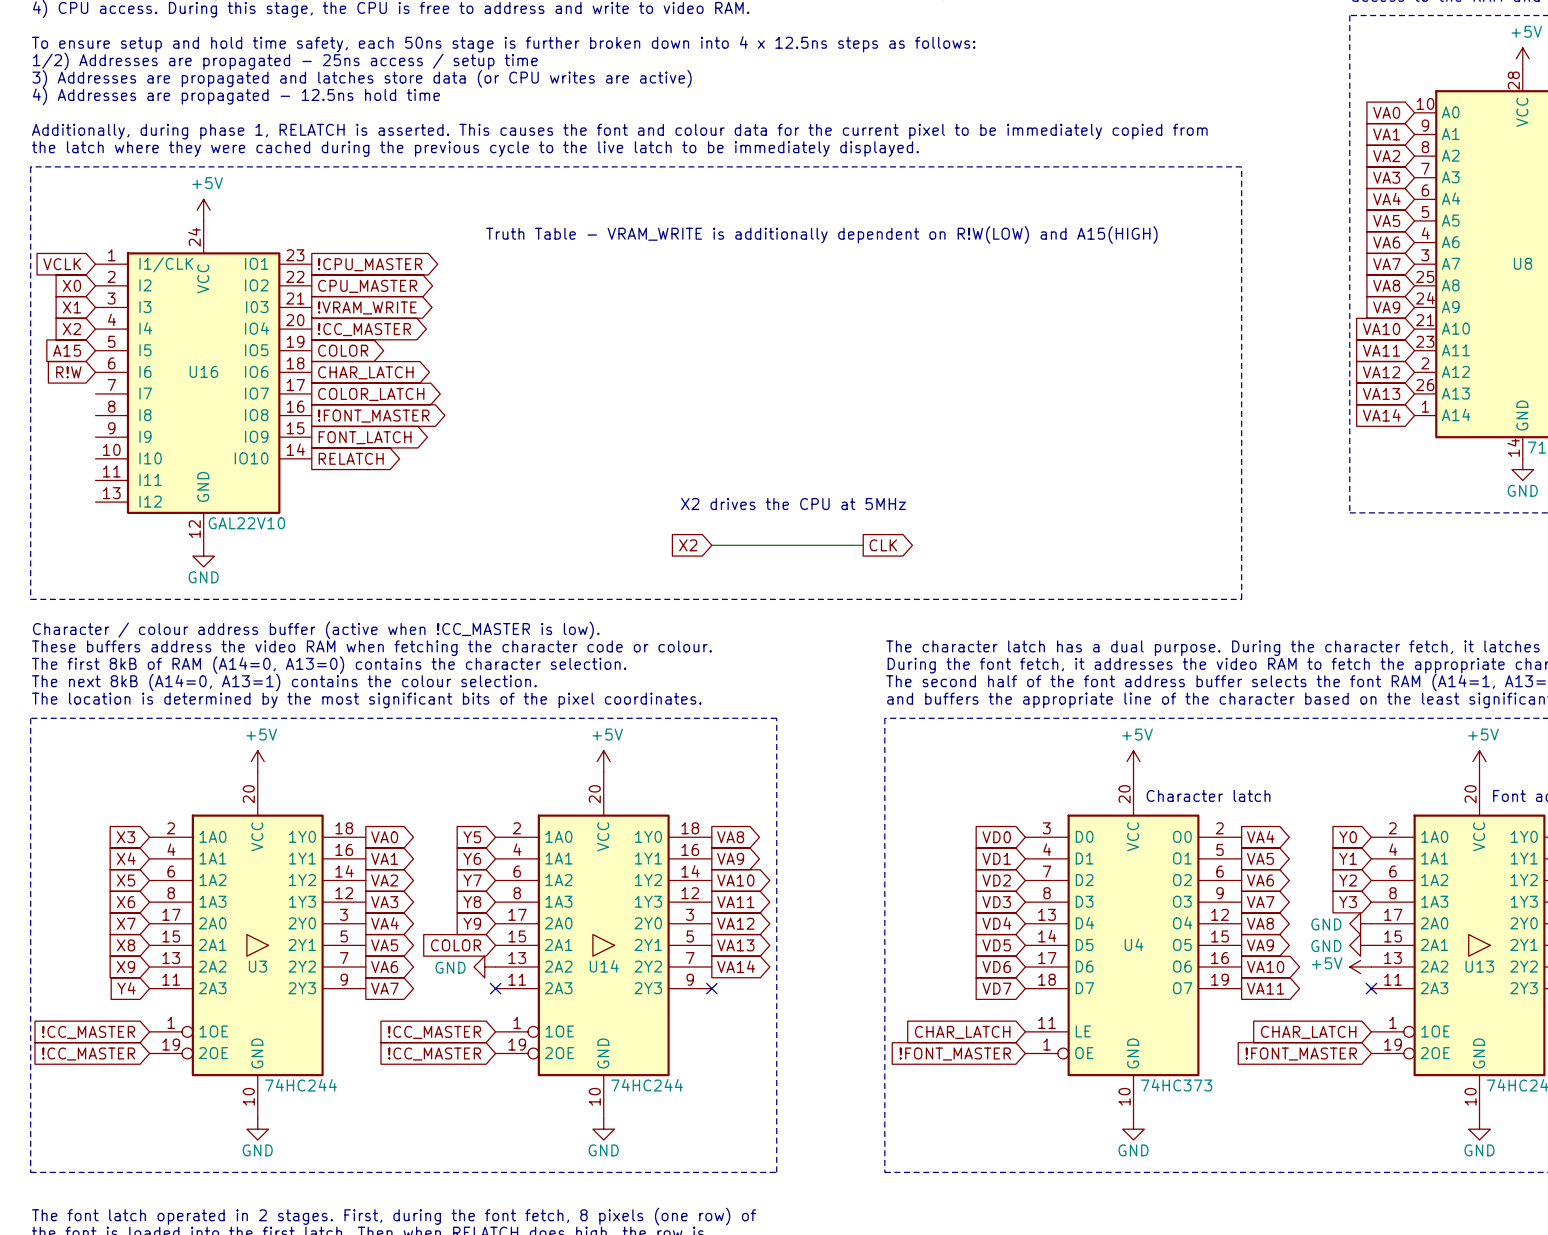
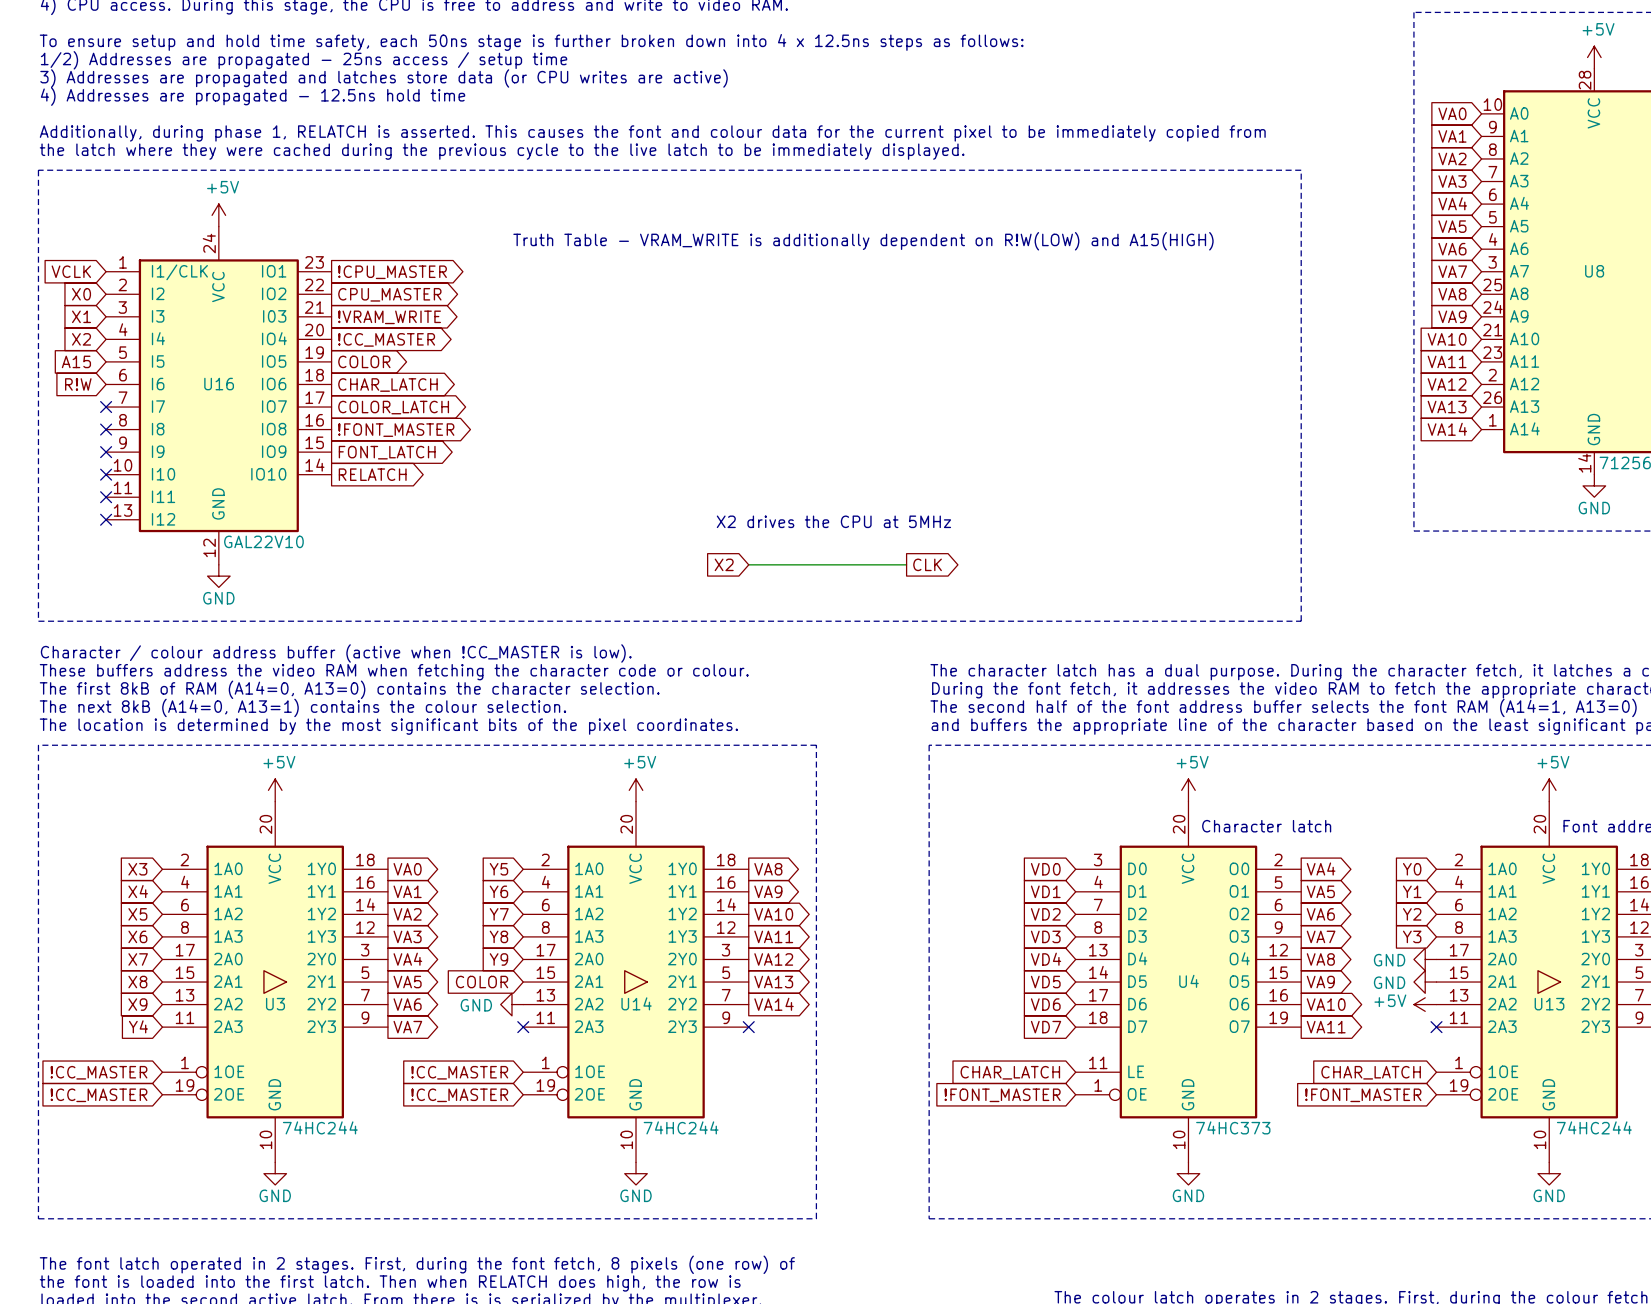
no-connect mark: none -> (106, 407)
no-connect mark: none -> (106, 429)
no-connect mark: none -> (106, 452)
no-connect mark: none -> (106, 474)
no-connect mark: none -> (106, 497)
no-connect mark: none -> (106, 519)

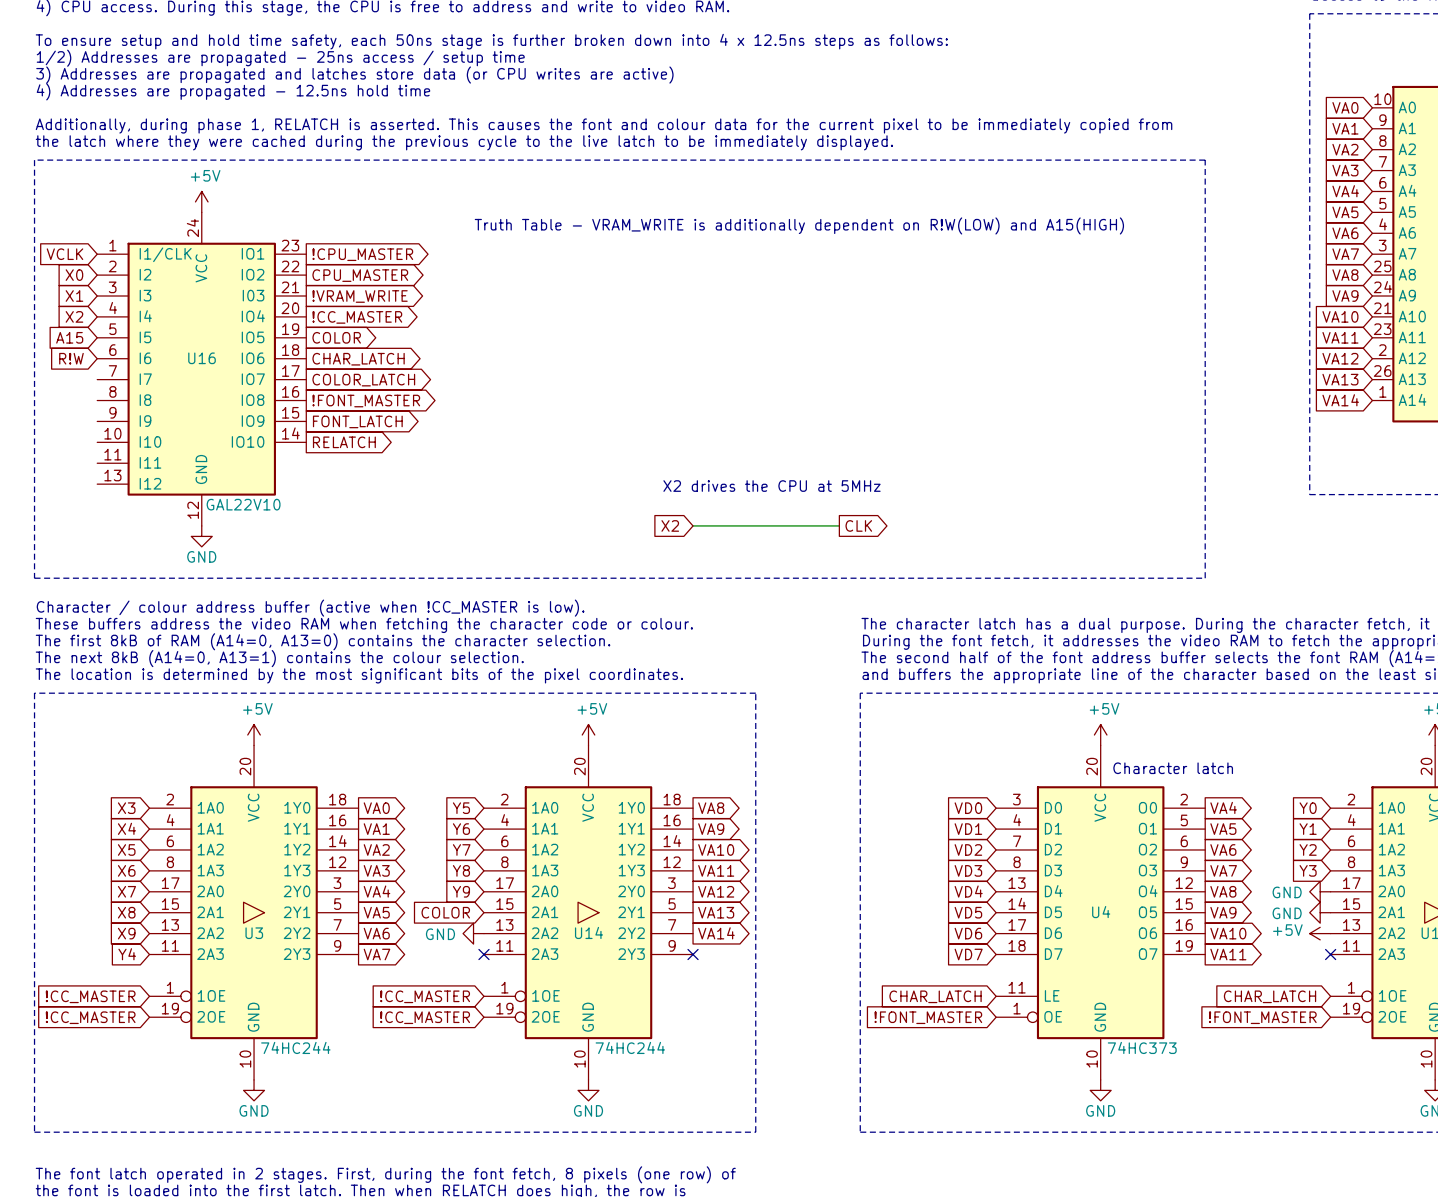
no-connect mark: (106, 407) -> none
no-connect mark: (106, 429) -> none
no-connect mark: (106, 452) -> none
no-connect mark: (106, 474) -> none
no-connect mark: (106, 497) -> none
no-connect mark: (106, 519) -> none

